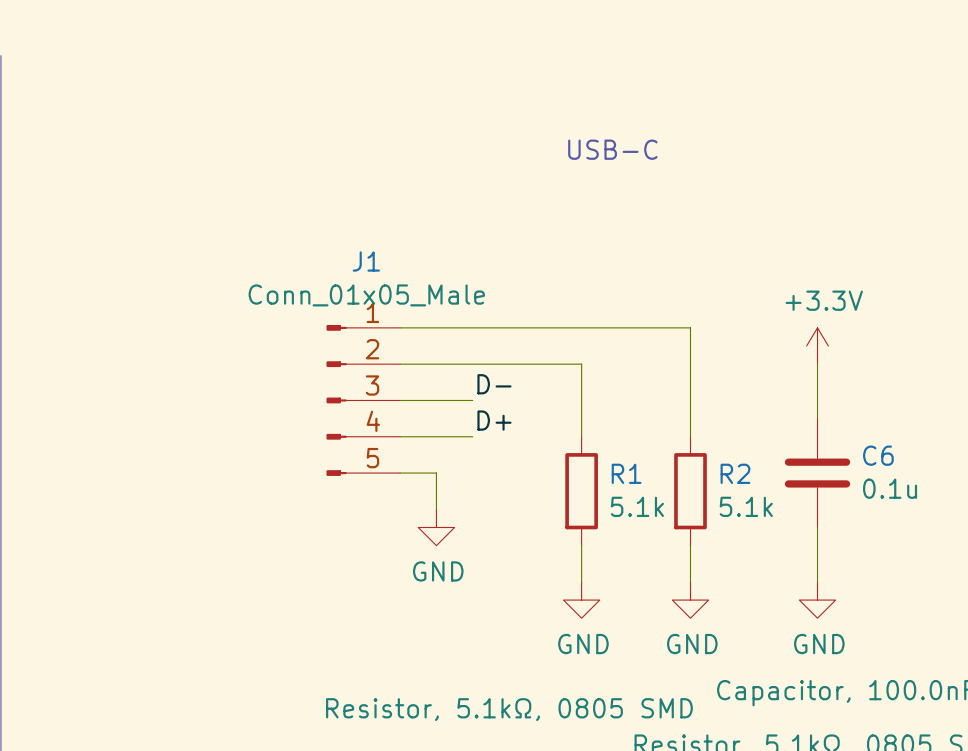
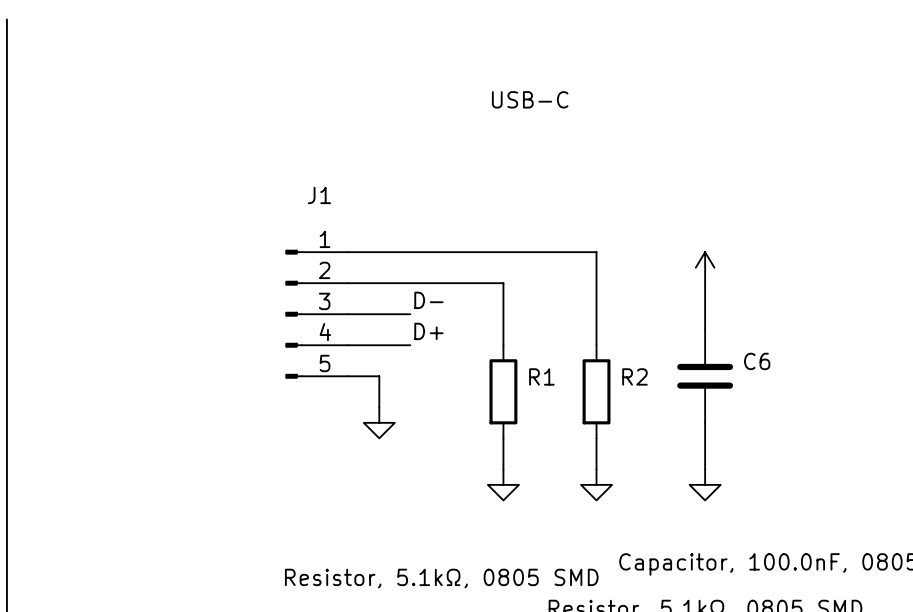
J1 value: Conn_01x05_Male (366, 295) -> none
power symbol text: +3.3V (824, 300) -> none
C6 value: 0.1u (890, 488) -> none
R1 value: 5.1k (637, 506) -> none
R2 value: 5.1k (746, 506) -> none
power symbol text: GND (438, 571) -> none
power symbol text: GND (583, 644) -> none
power symbol text: GND (692, 644) -> none
power symbol text: GND (819, 644) -> none

